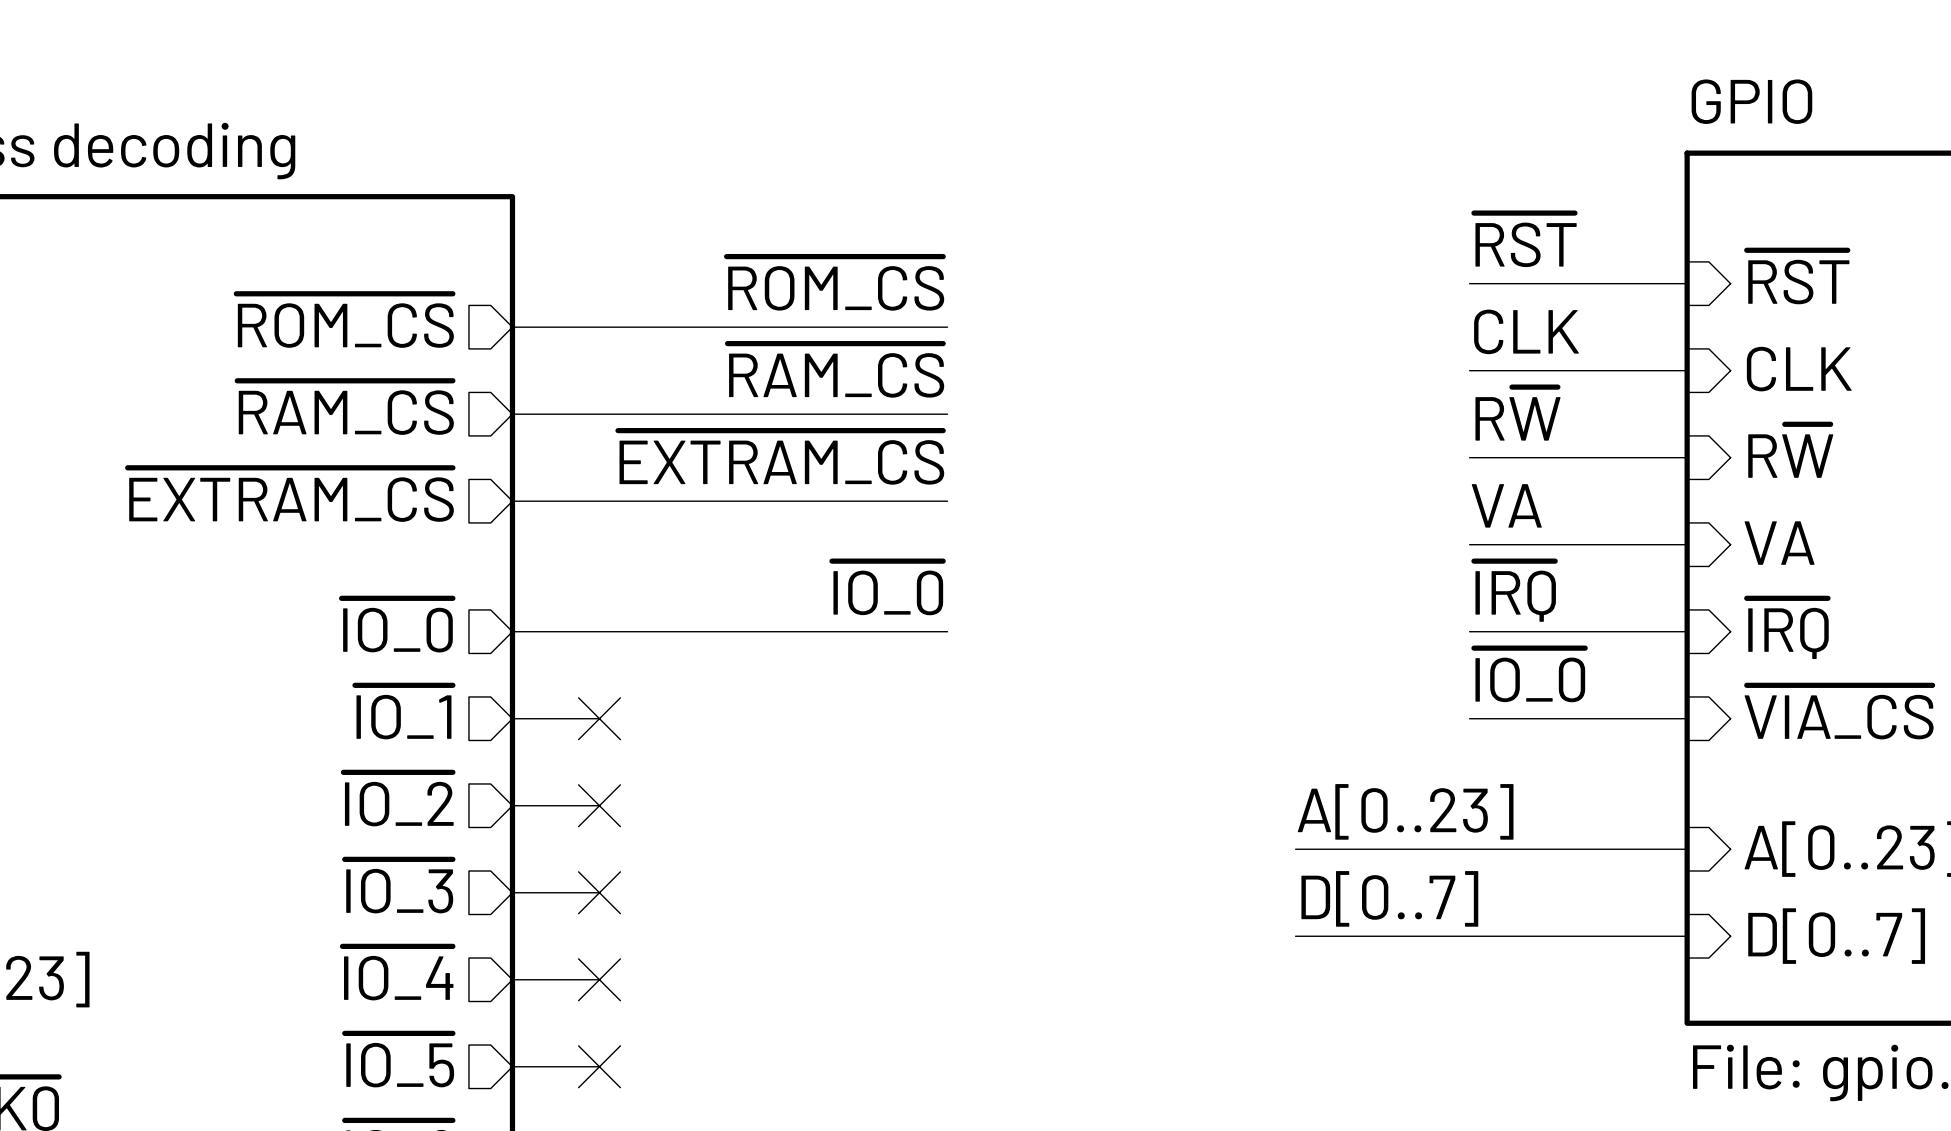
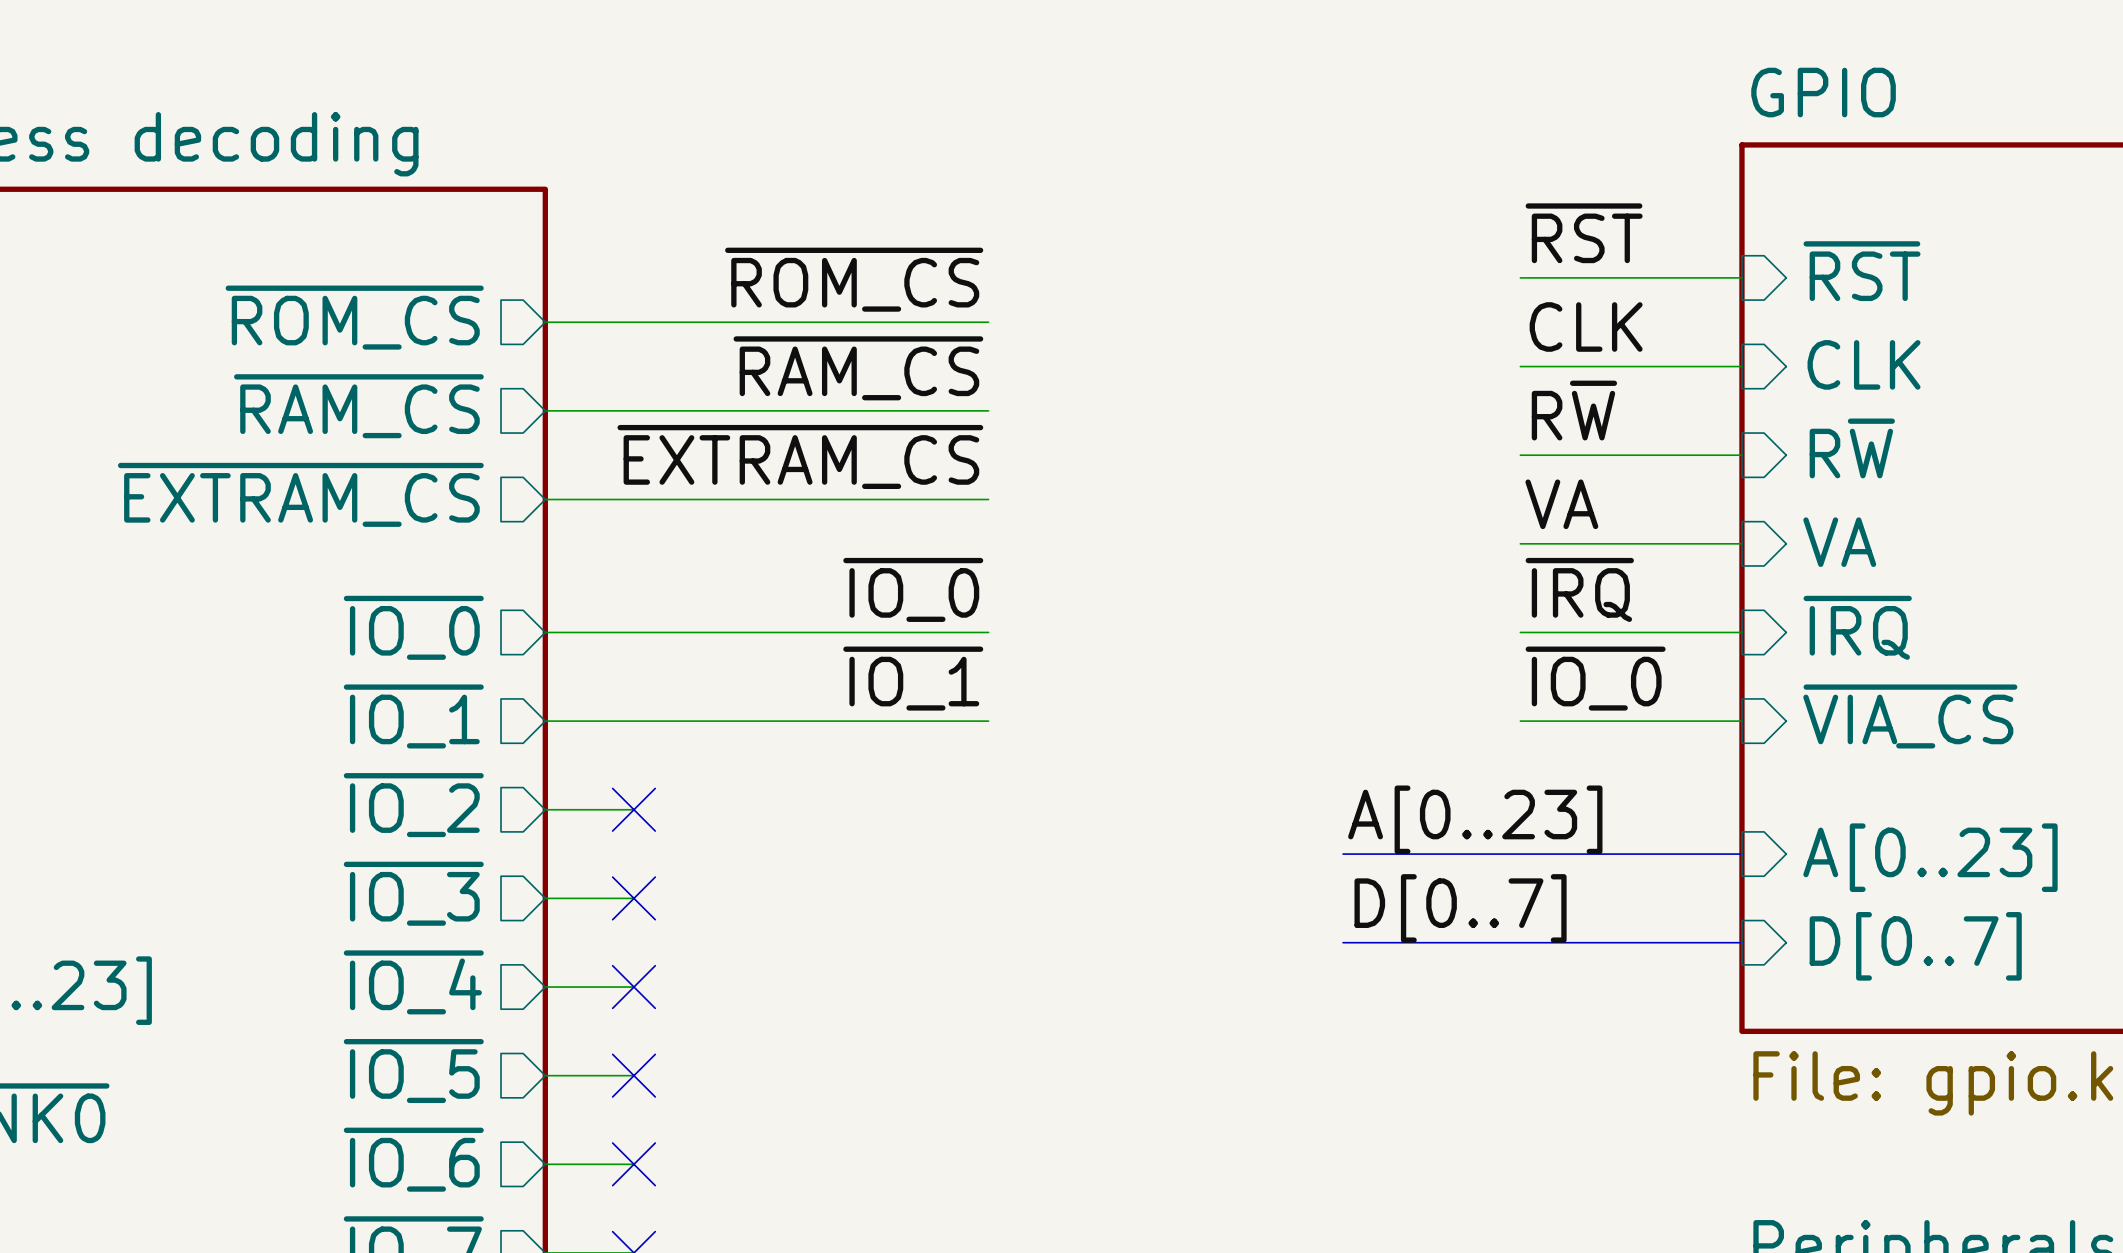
label: none -> ~{IO_1} (913, 678)
wire: none -> (633, 721) (988, 721)
no-connect mark: (599, 718) -> none

